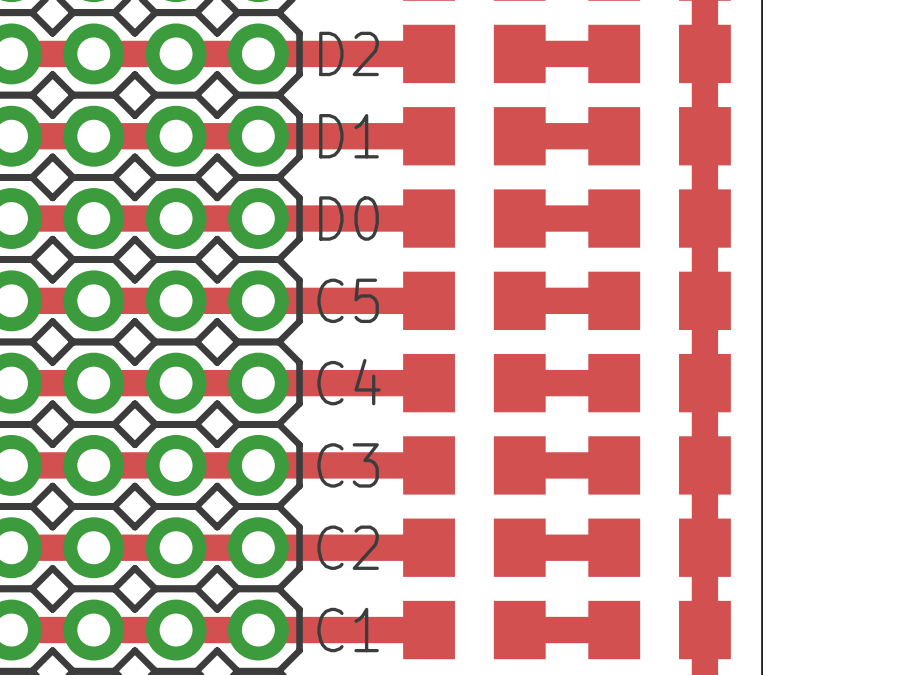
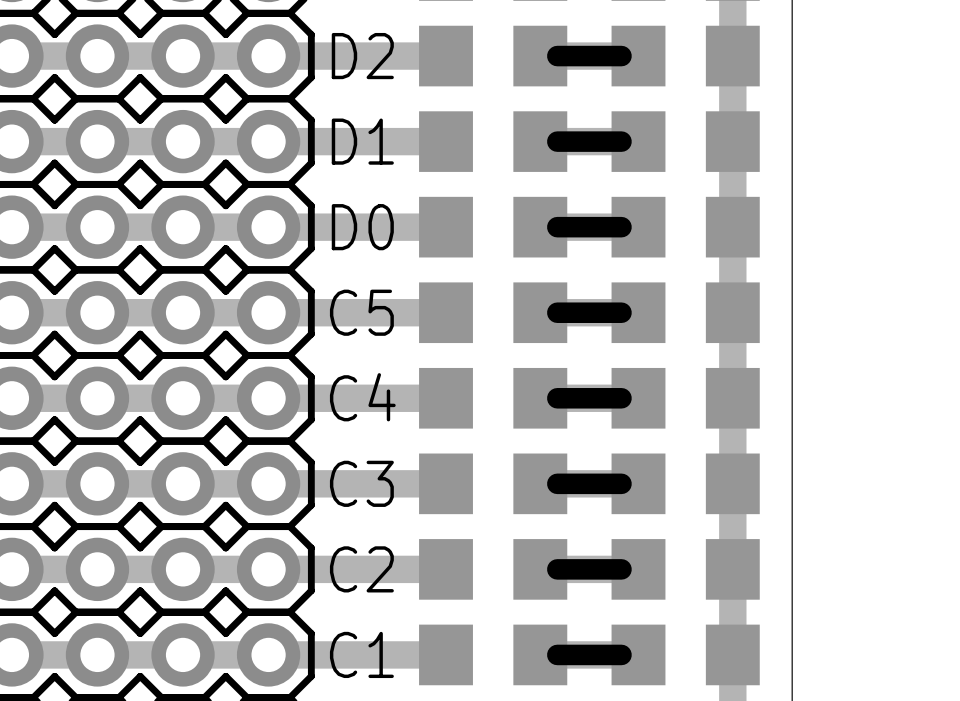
line: none -> (557, 56) (621, 56)
line: none -> (557, 141) (621, 141)
line: none -> (557, 227) (621, 227)
line: none -> (557, 312) (621, 312)
line: none -> (557, 398) (621, 398)
line: none -> (557, 483) (621, 483)
line: none -> (557, 569) (621, 569)
line: none -> (557, 654) (621, 654)

